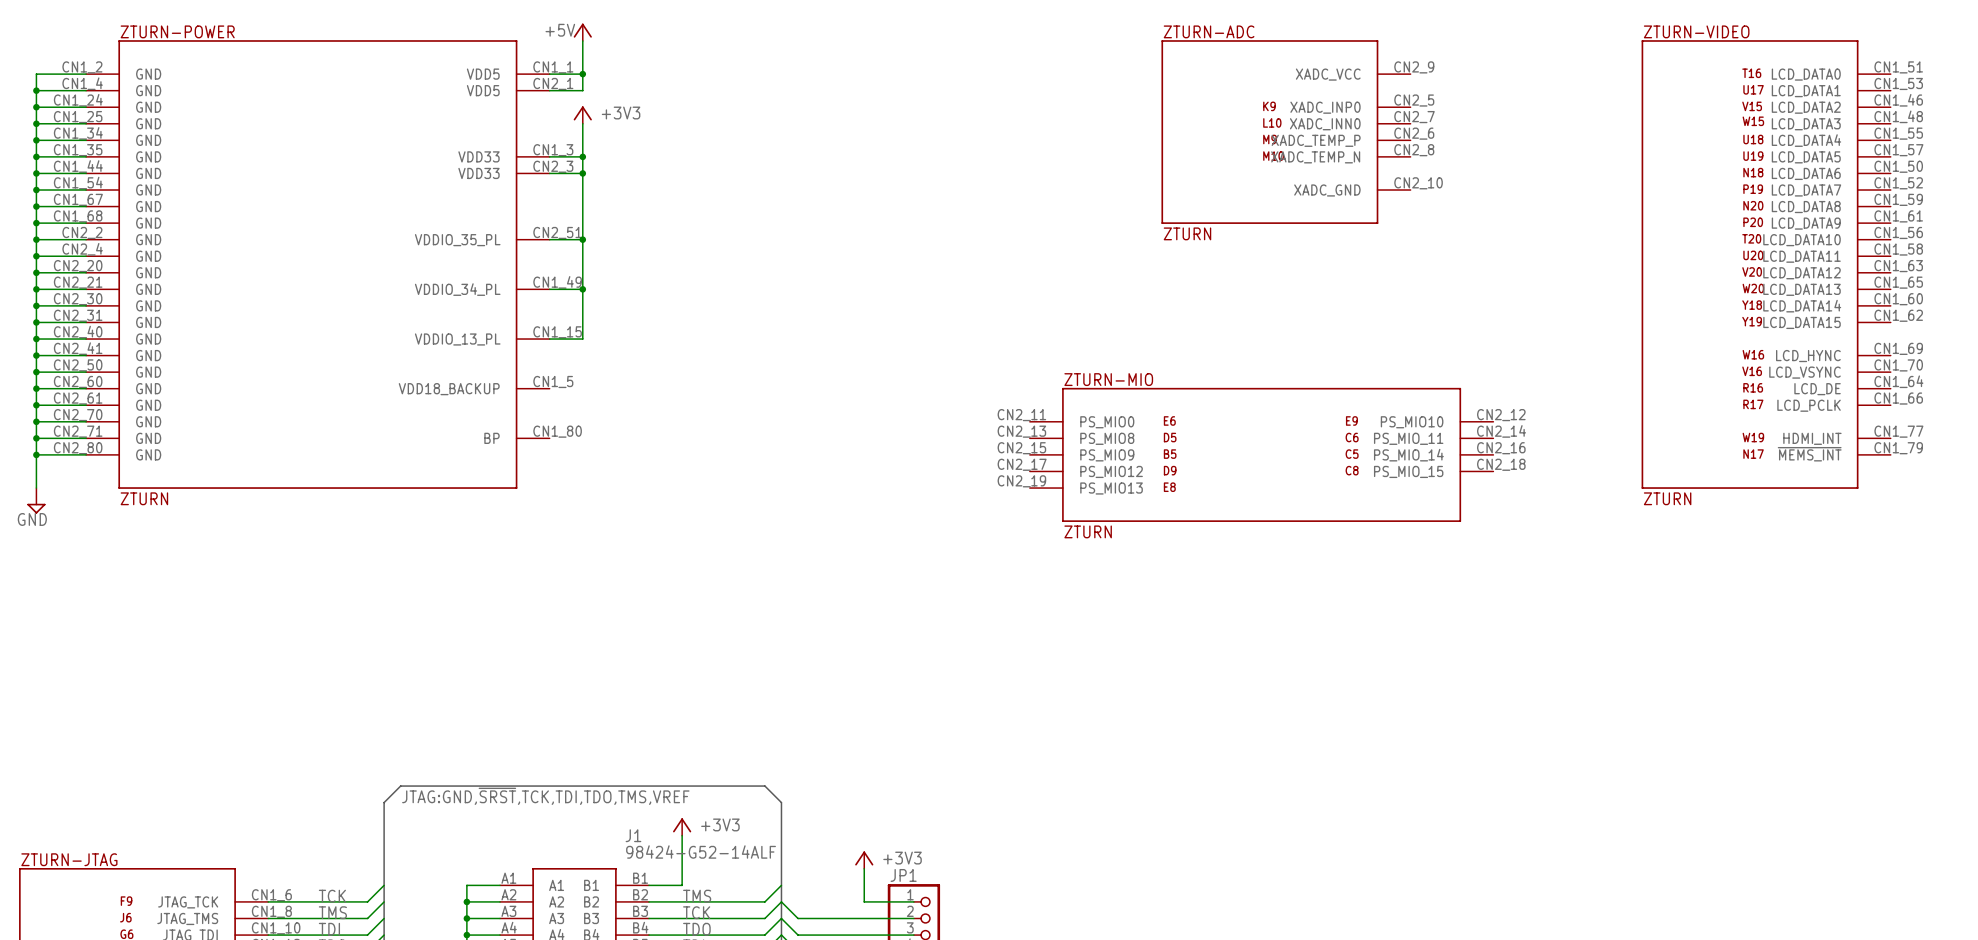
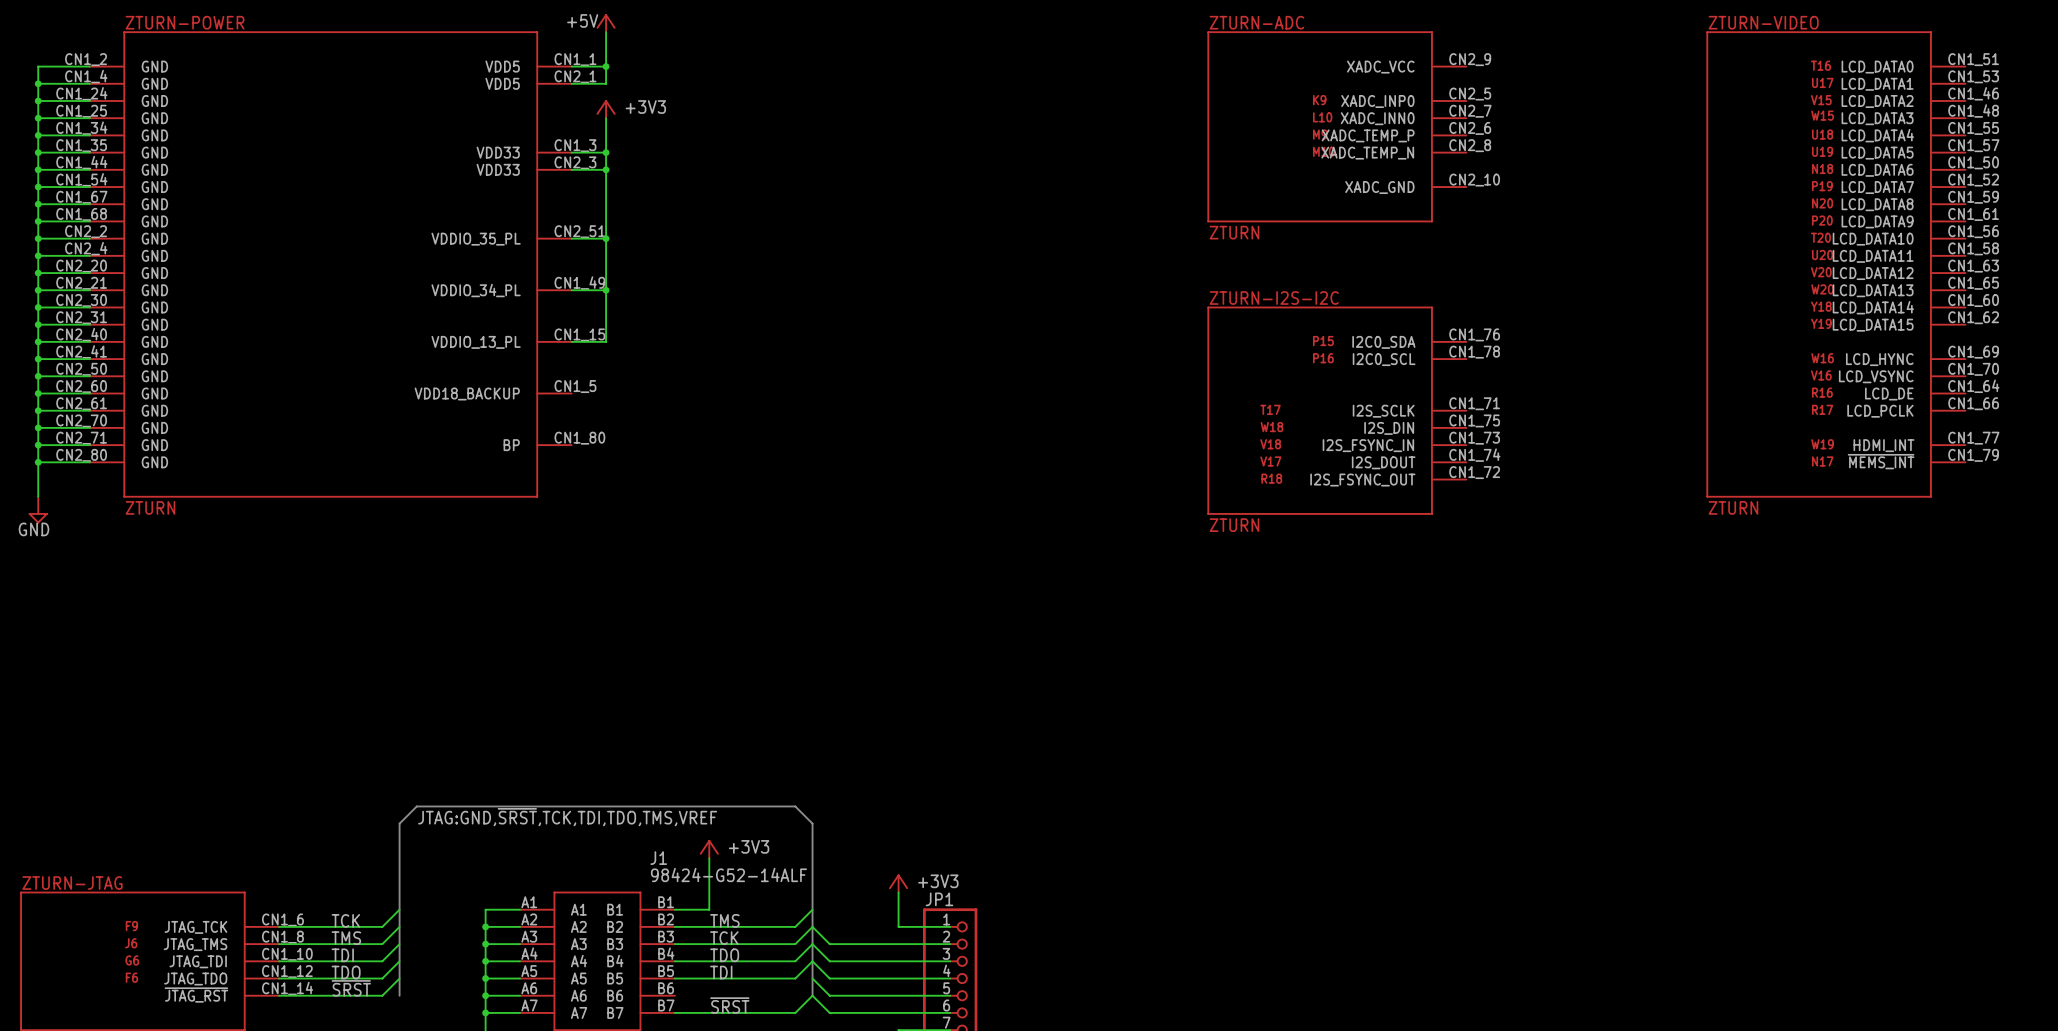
ZTURN-I2S-I2C: none -> ZTURN (1336, 410)
ZTURN-MIO: ZTURN (1261, 454) -> none

